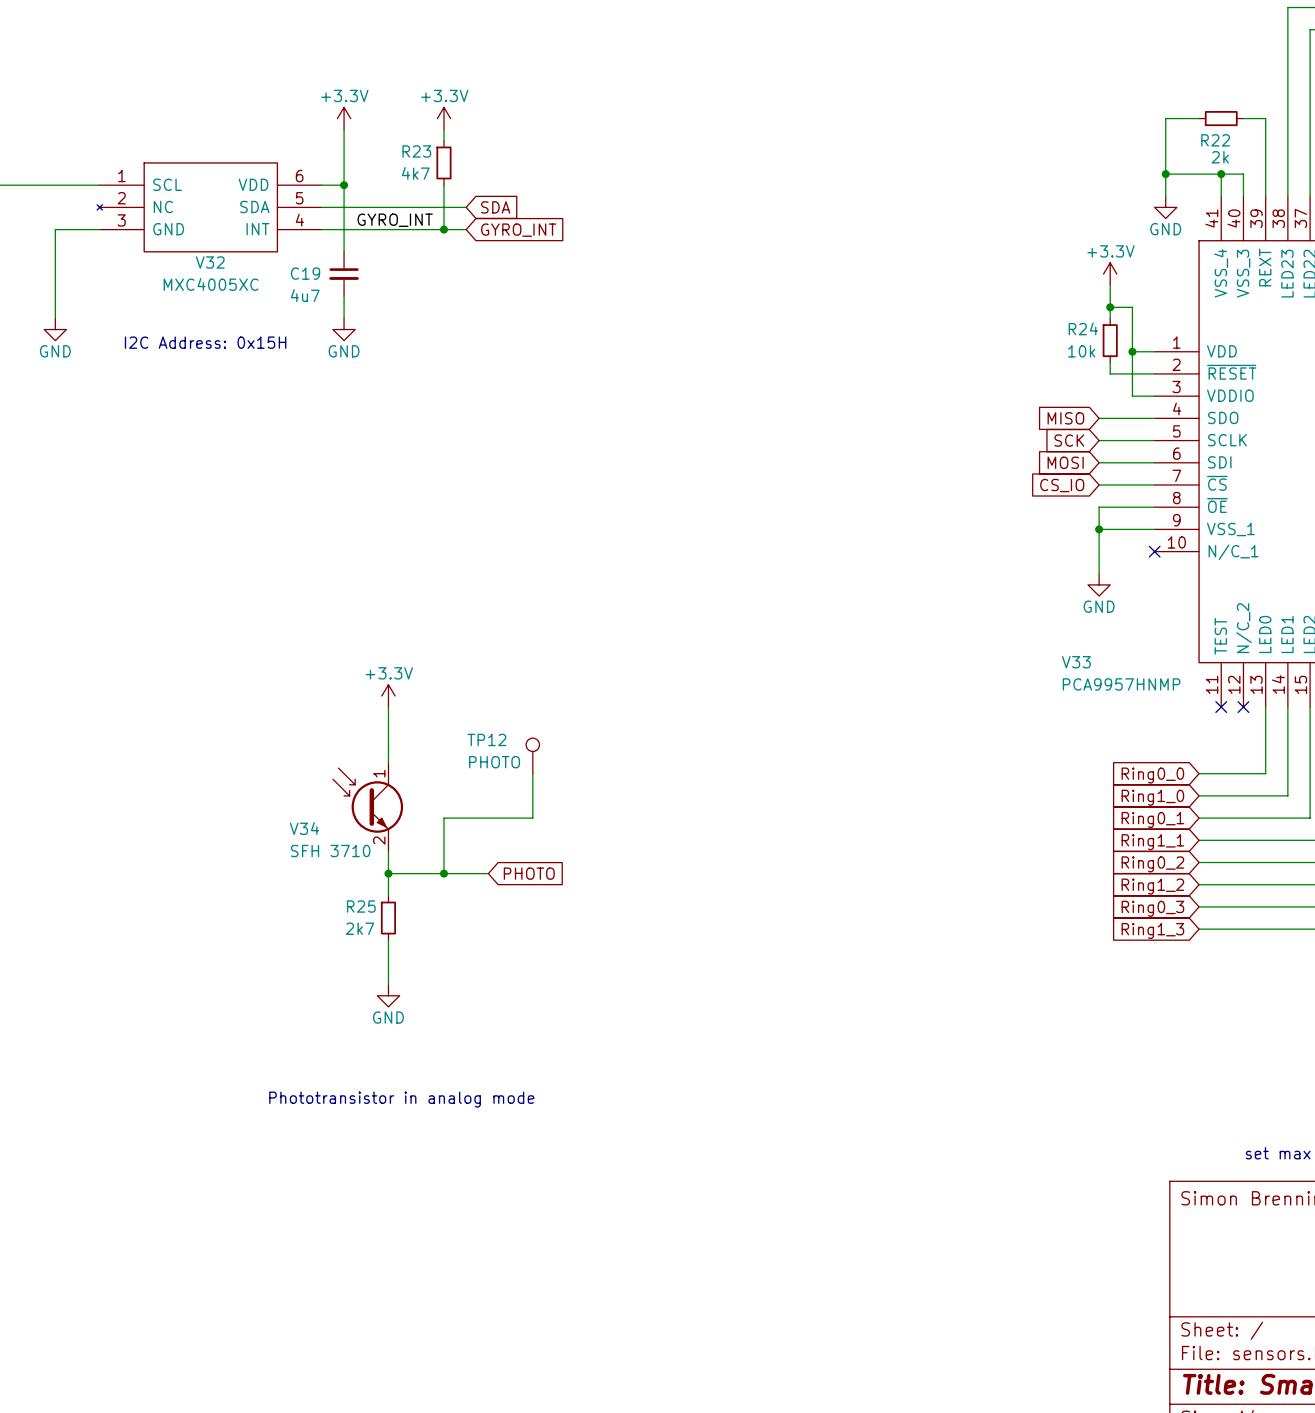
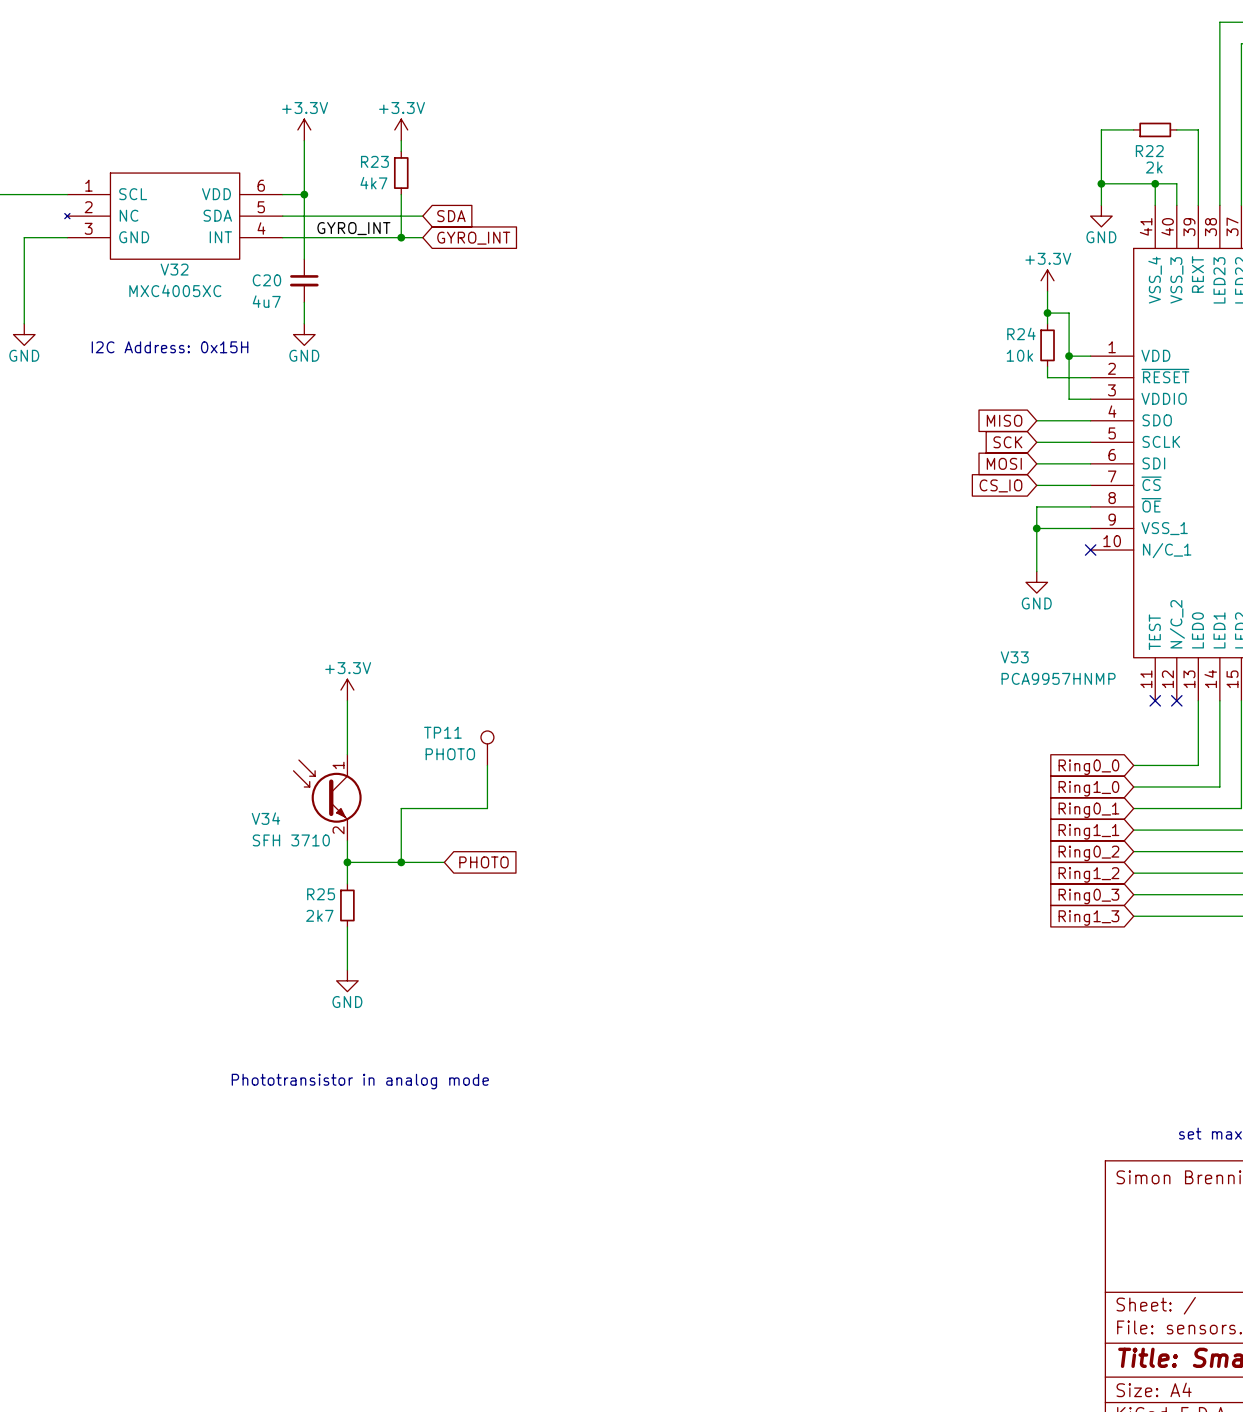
C19 name: C19 (305, 273) -> C20 (266, 280)
TP12 name: TP12 (486, 739) -> TP11 (442, 732)

